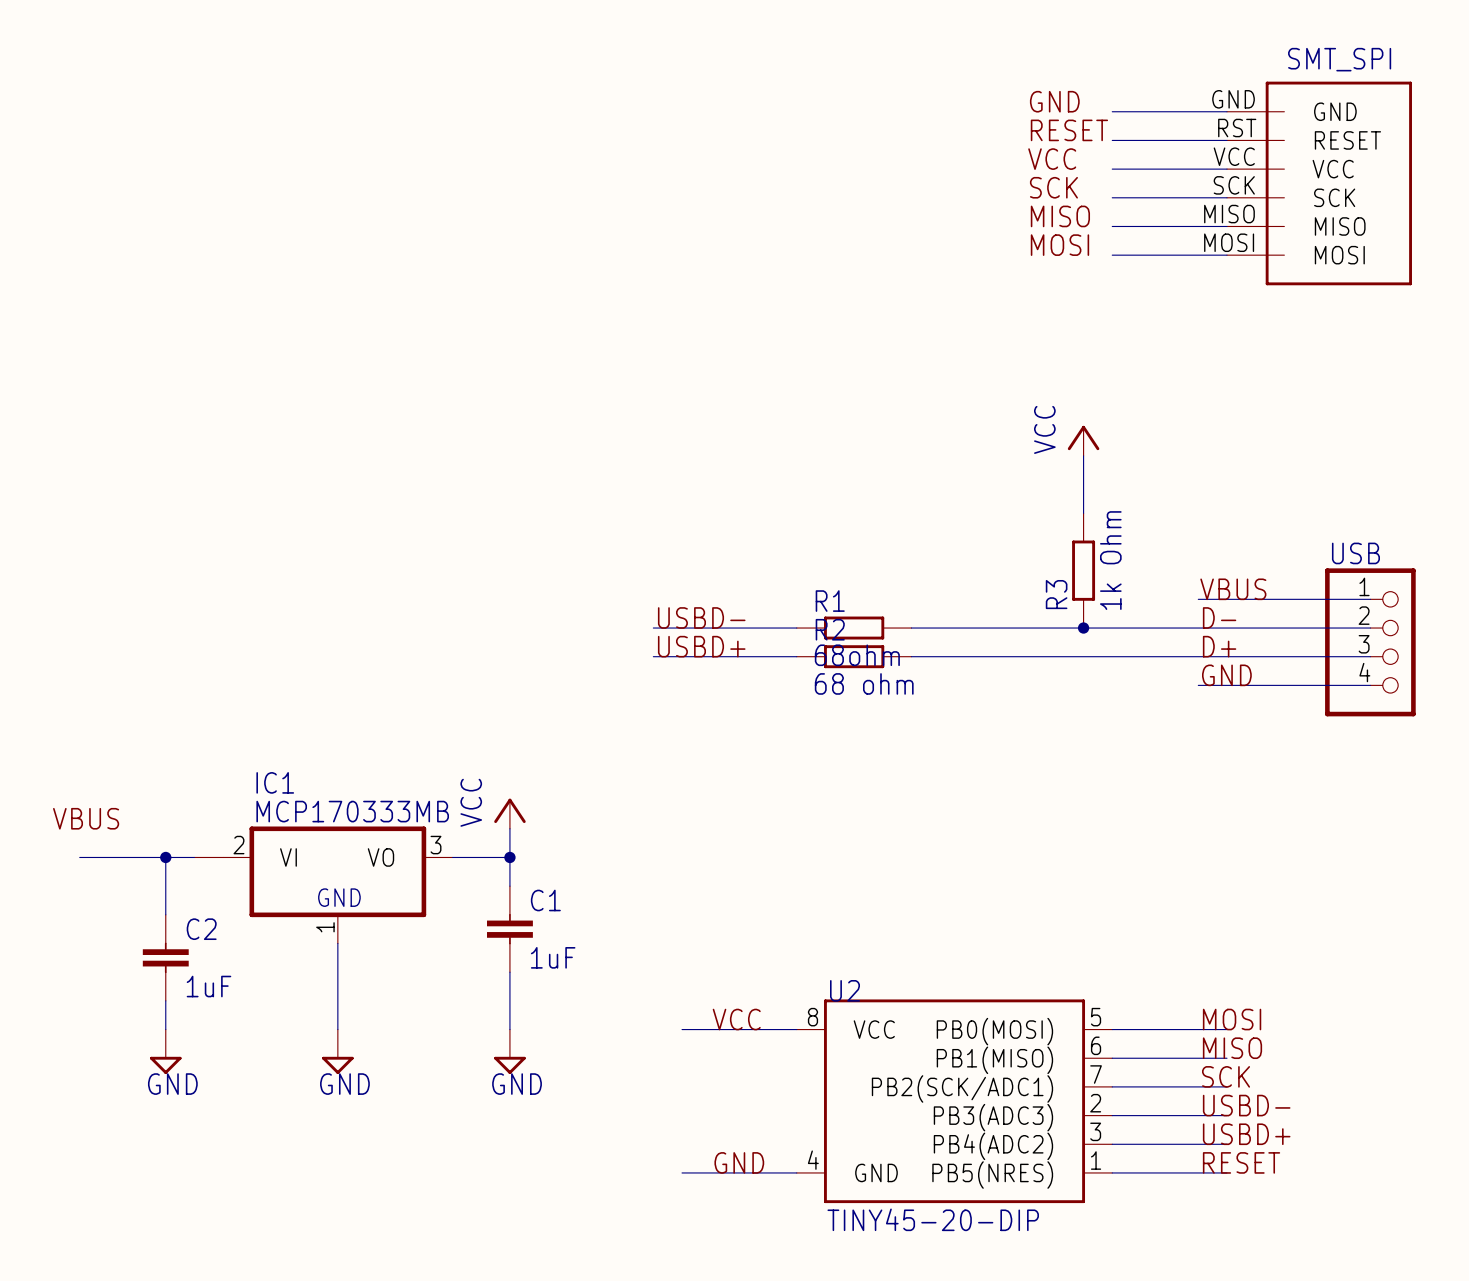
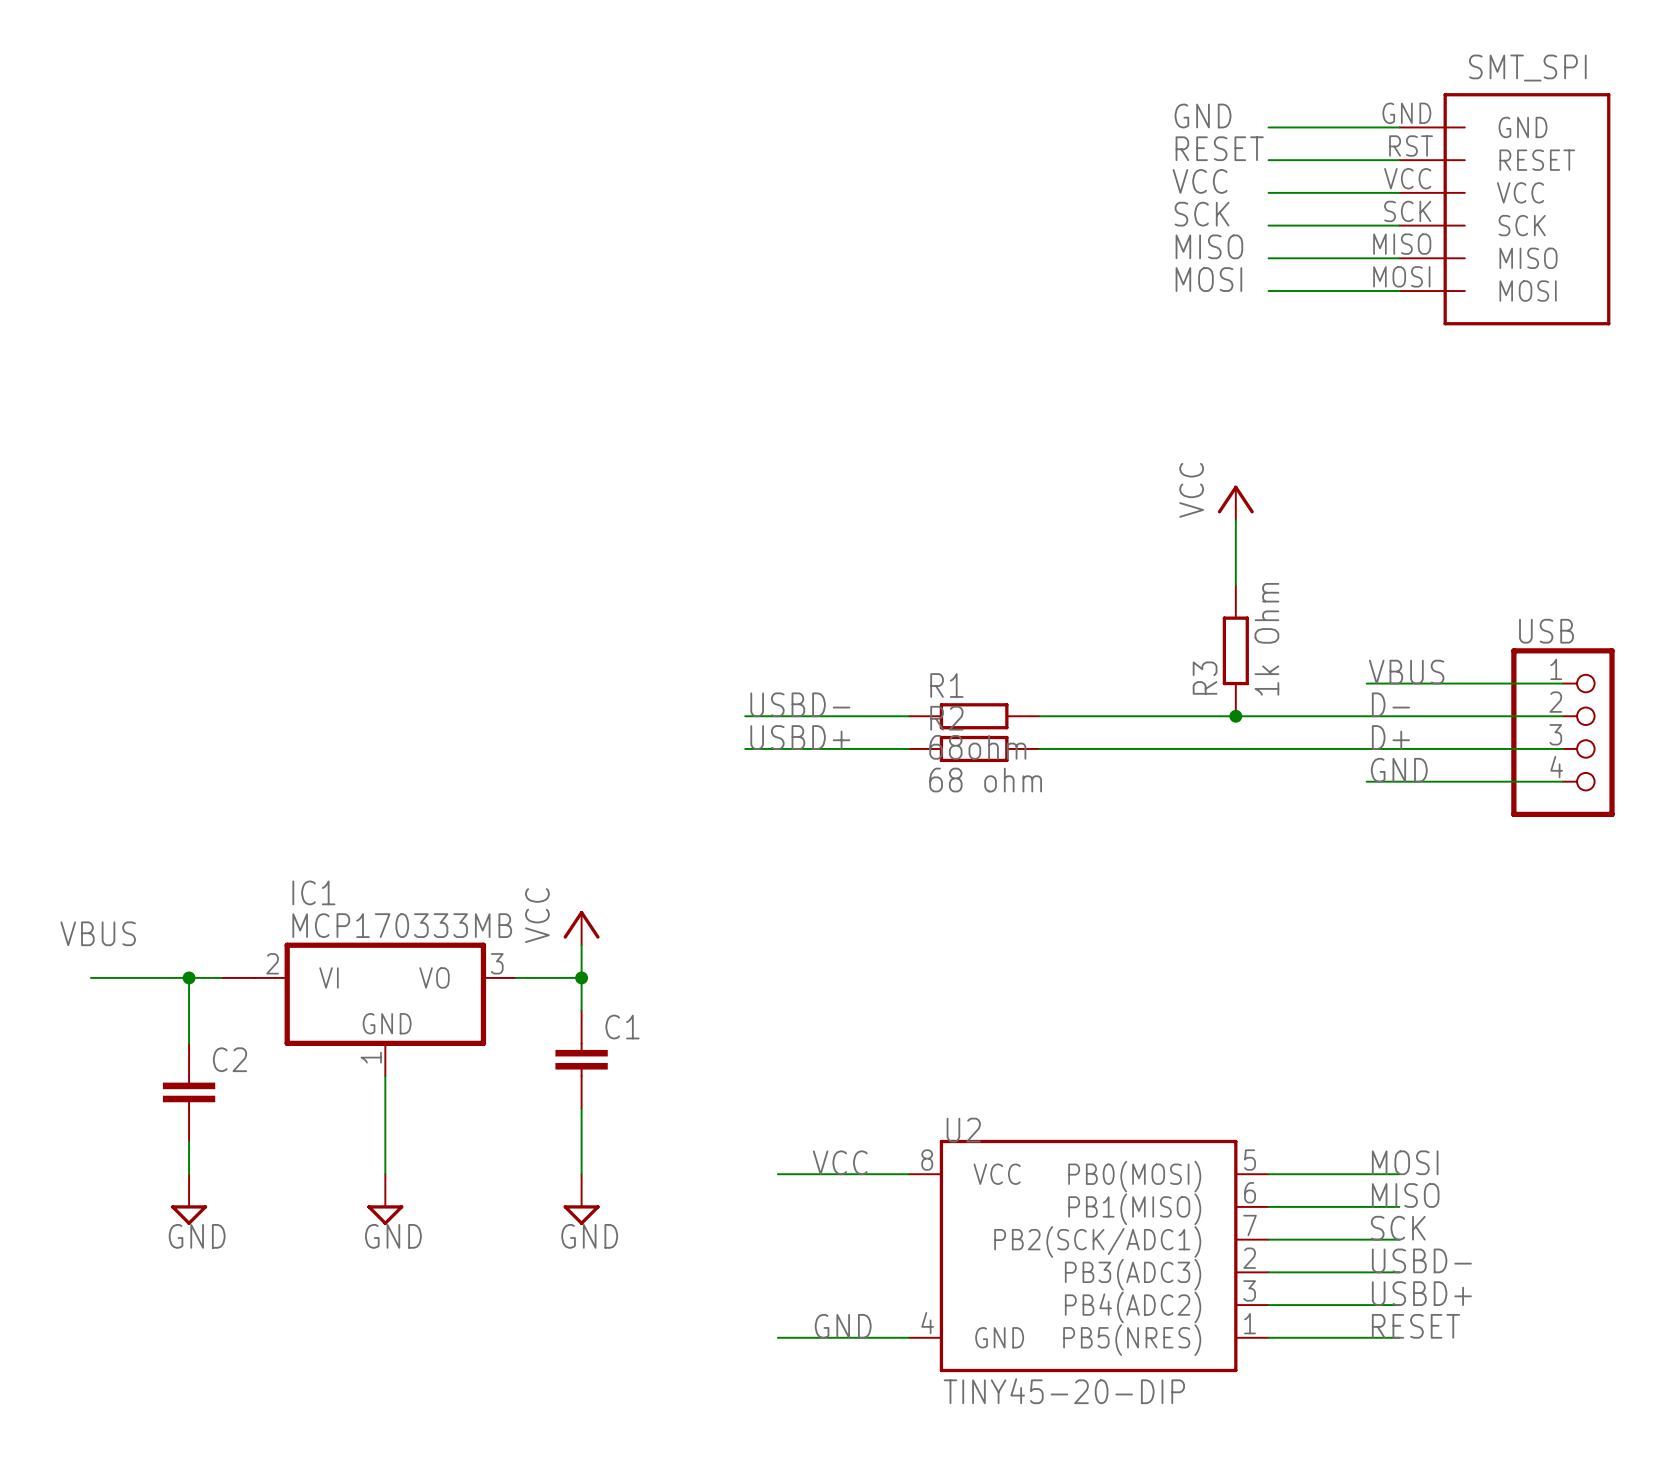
C1 value: 1uF (553, 957) -> none
C2 value: 1uF (208, 986) -> none

